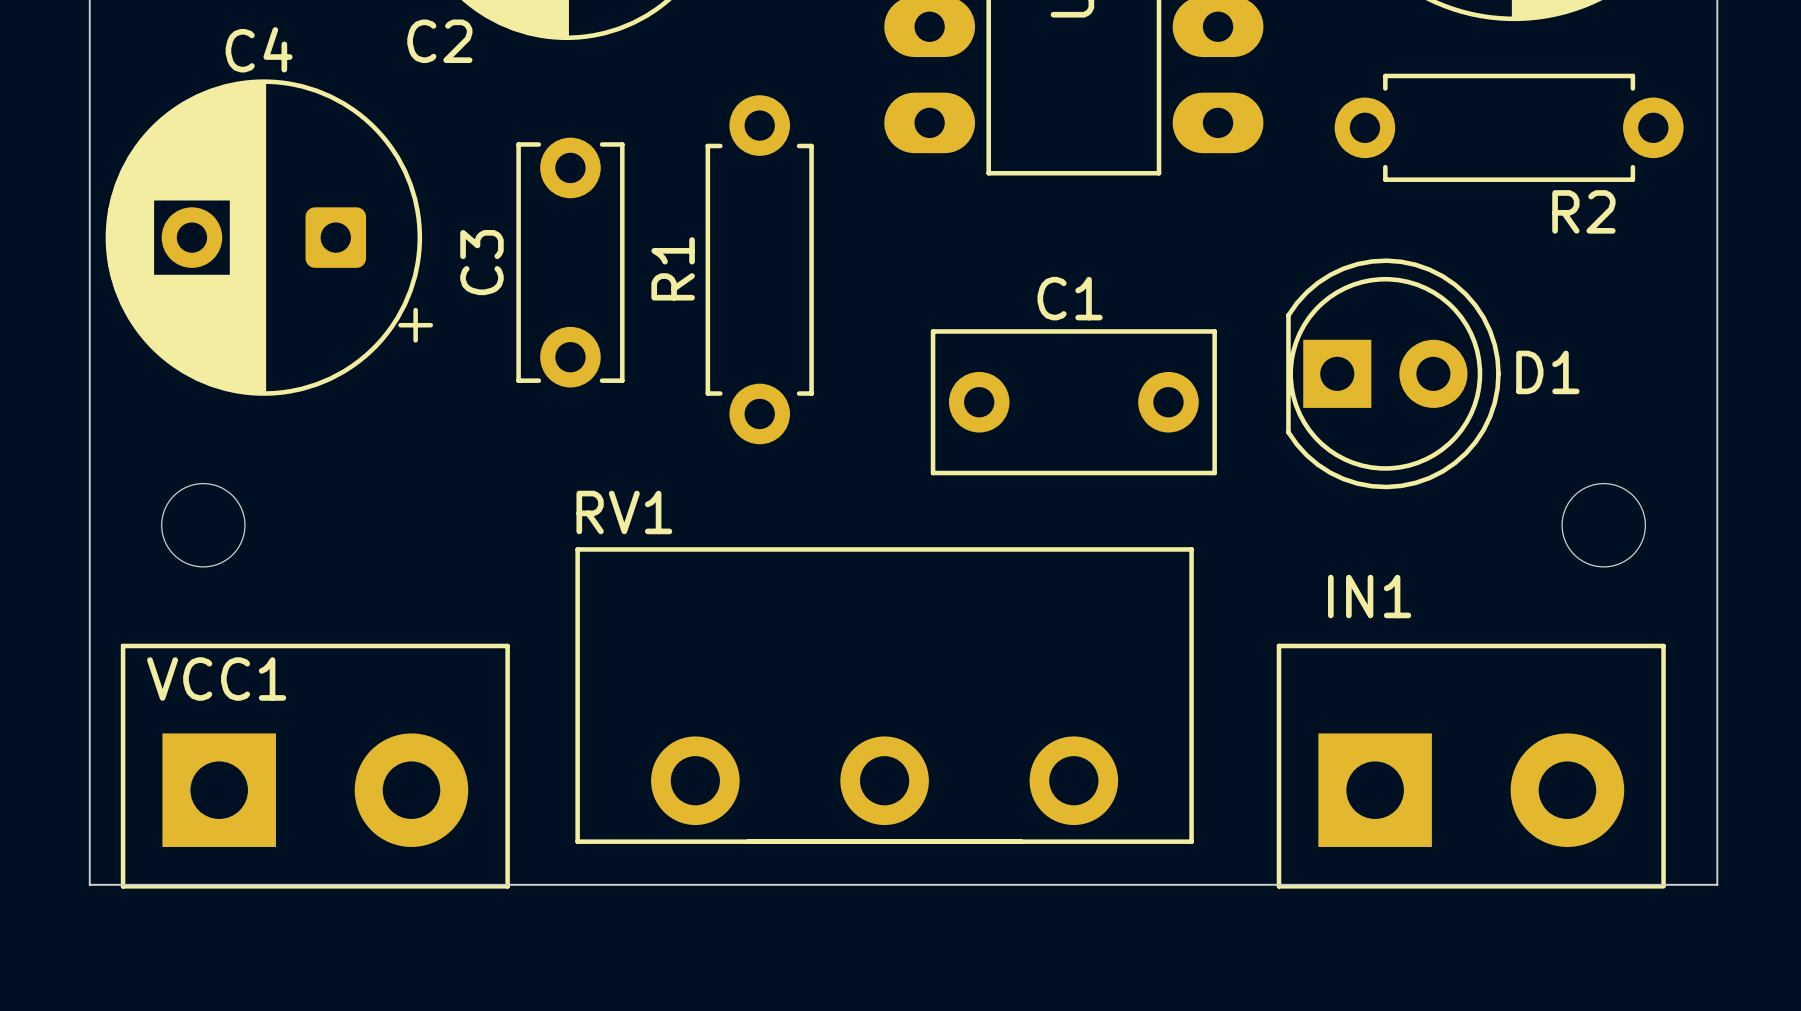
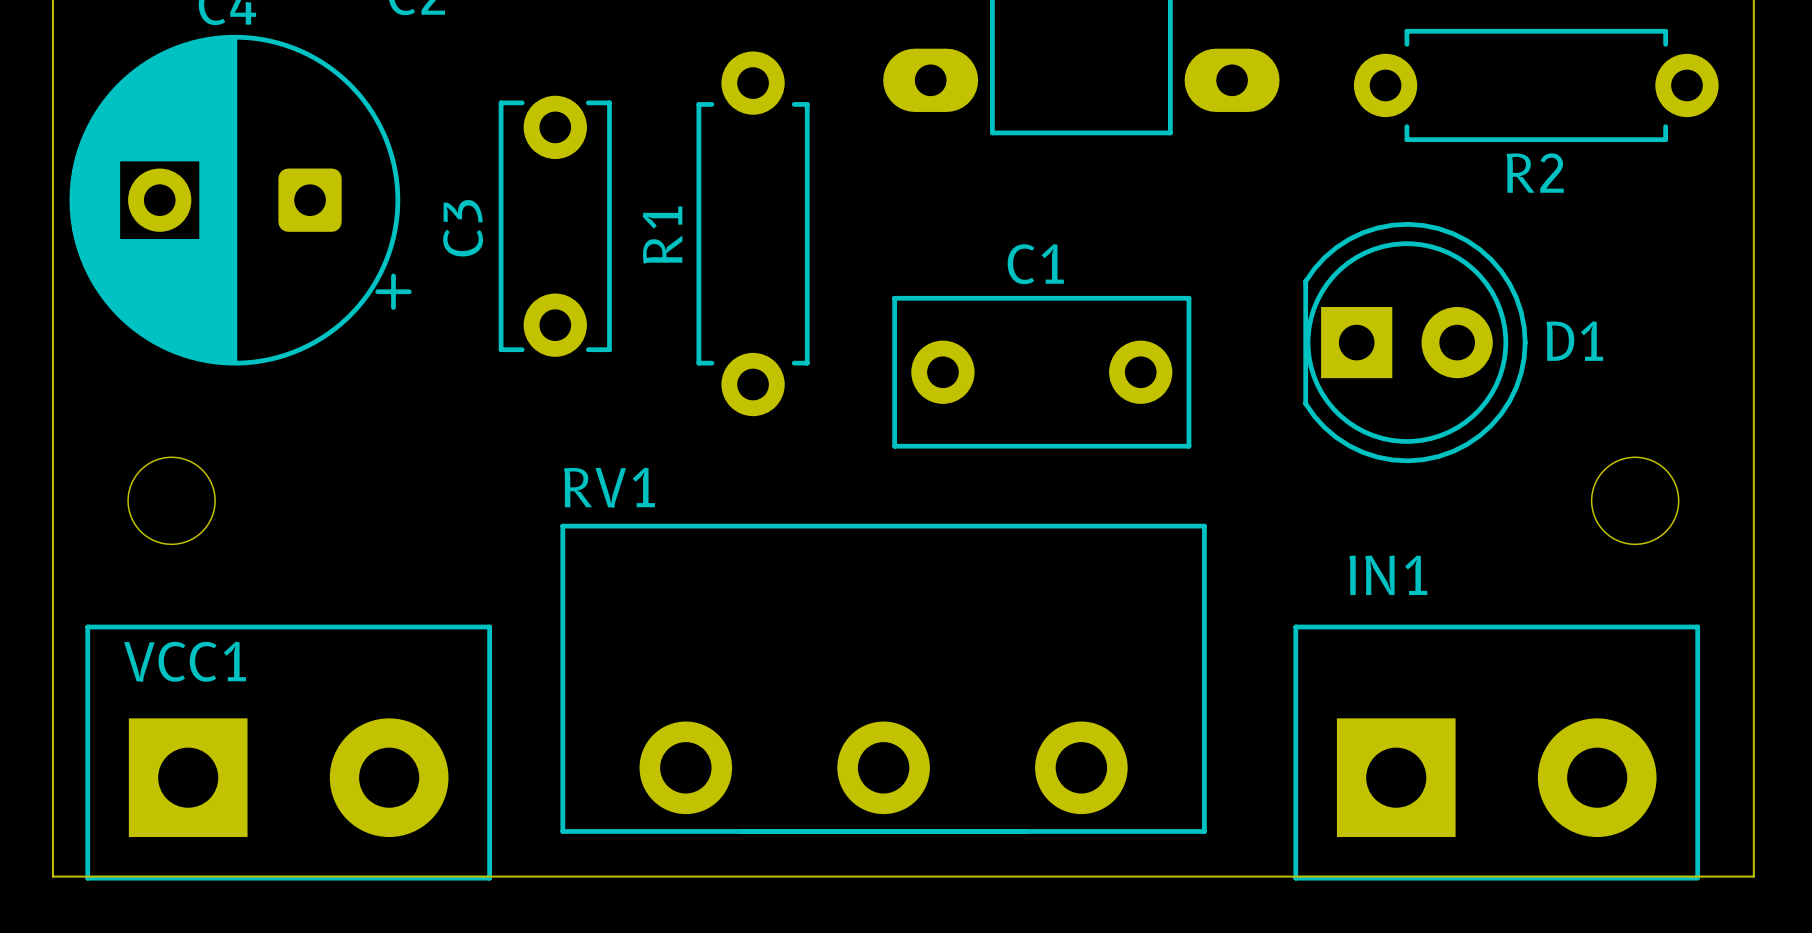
R2 name position: R2 (1583, 211) -> R2 (1535, 173)
C1 position: (1073, 402) -> (1041, 372)

